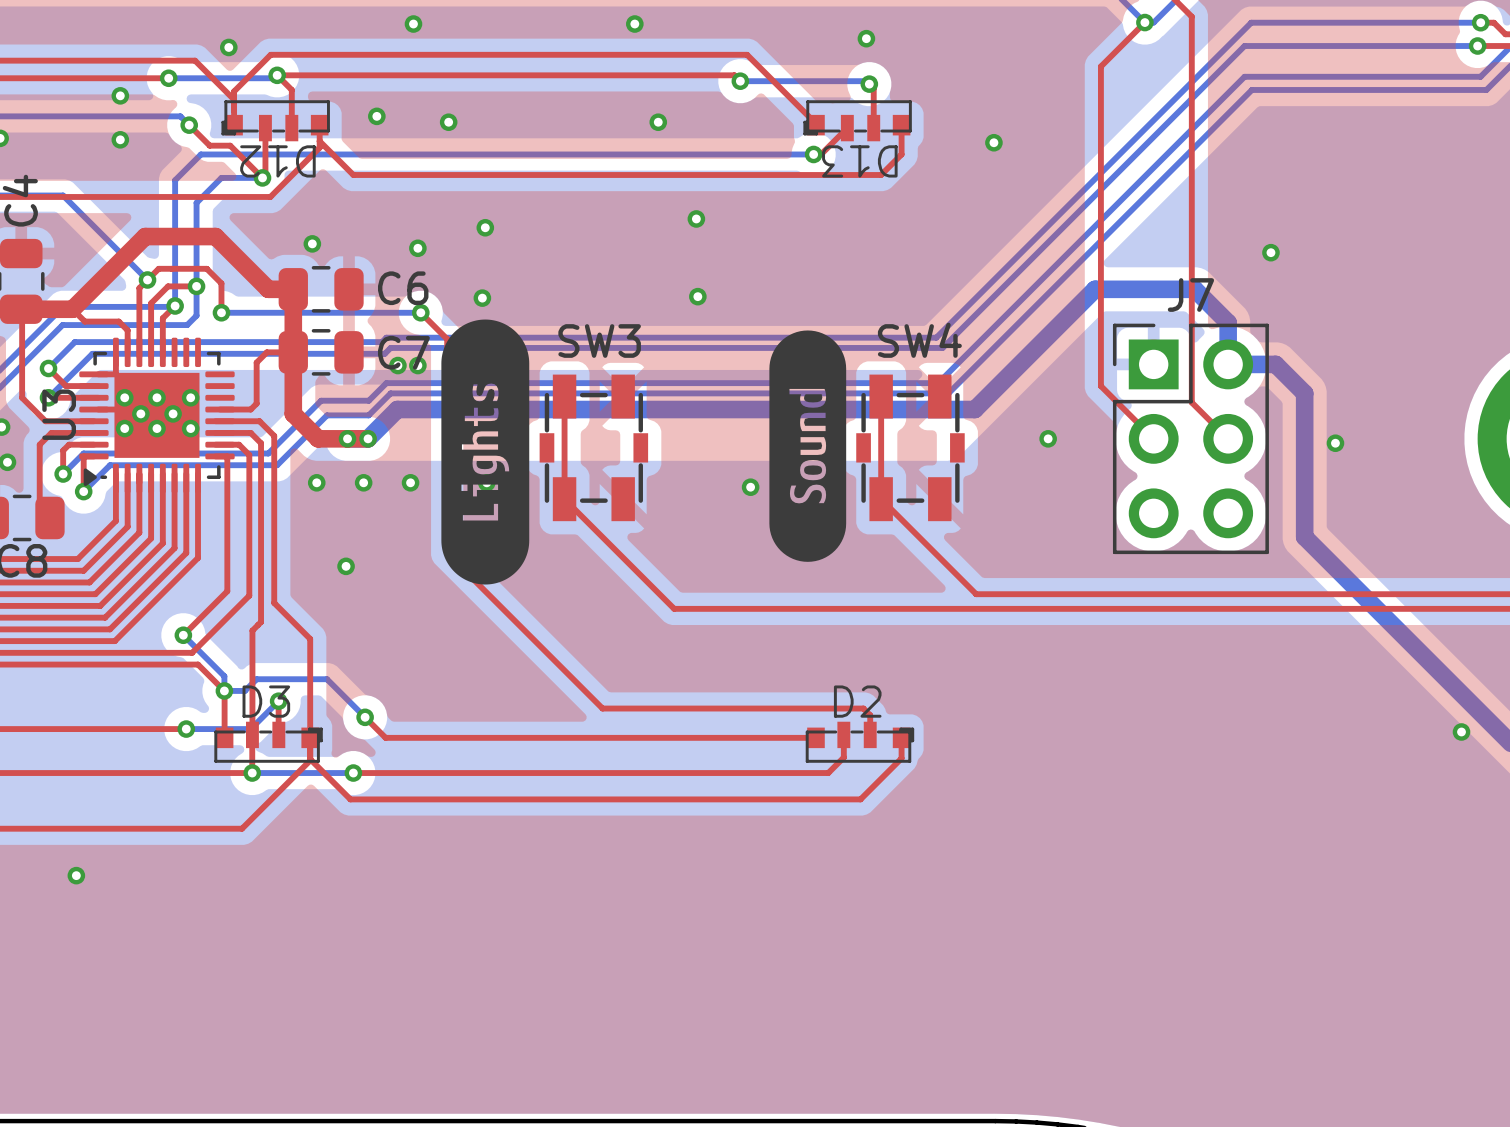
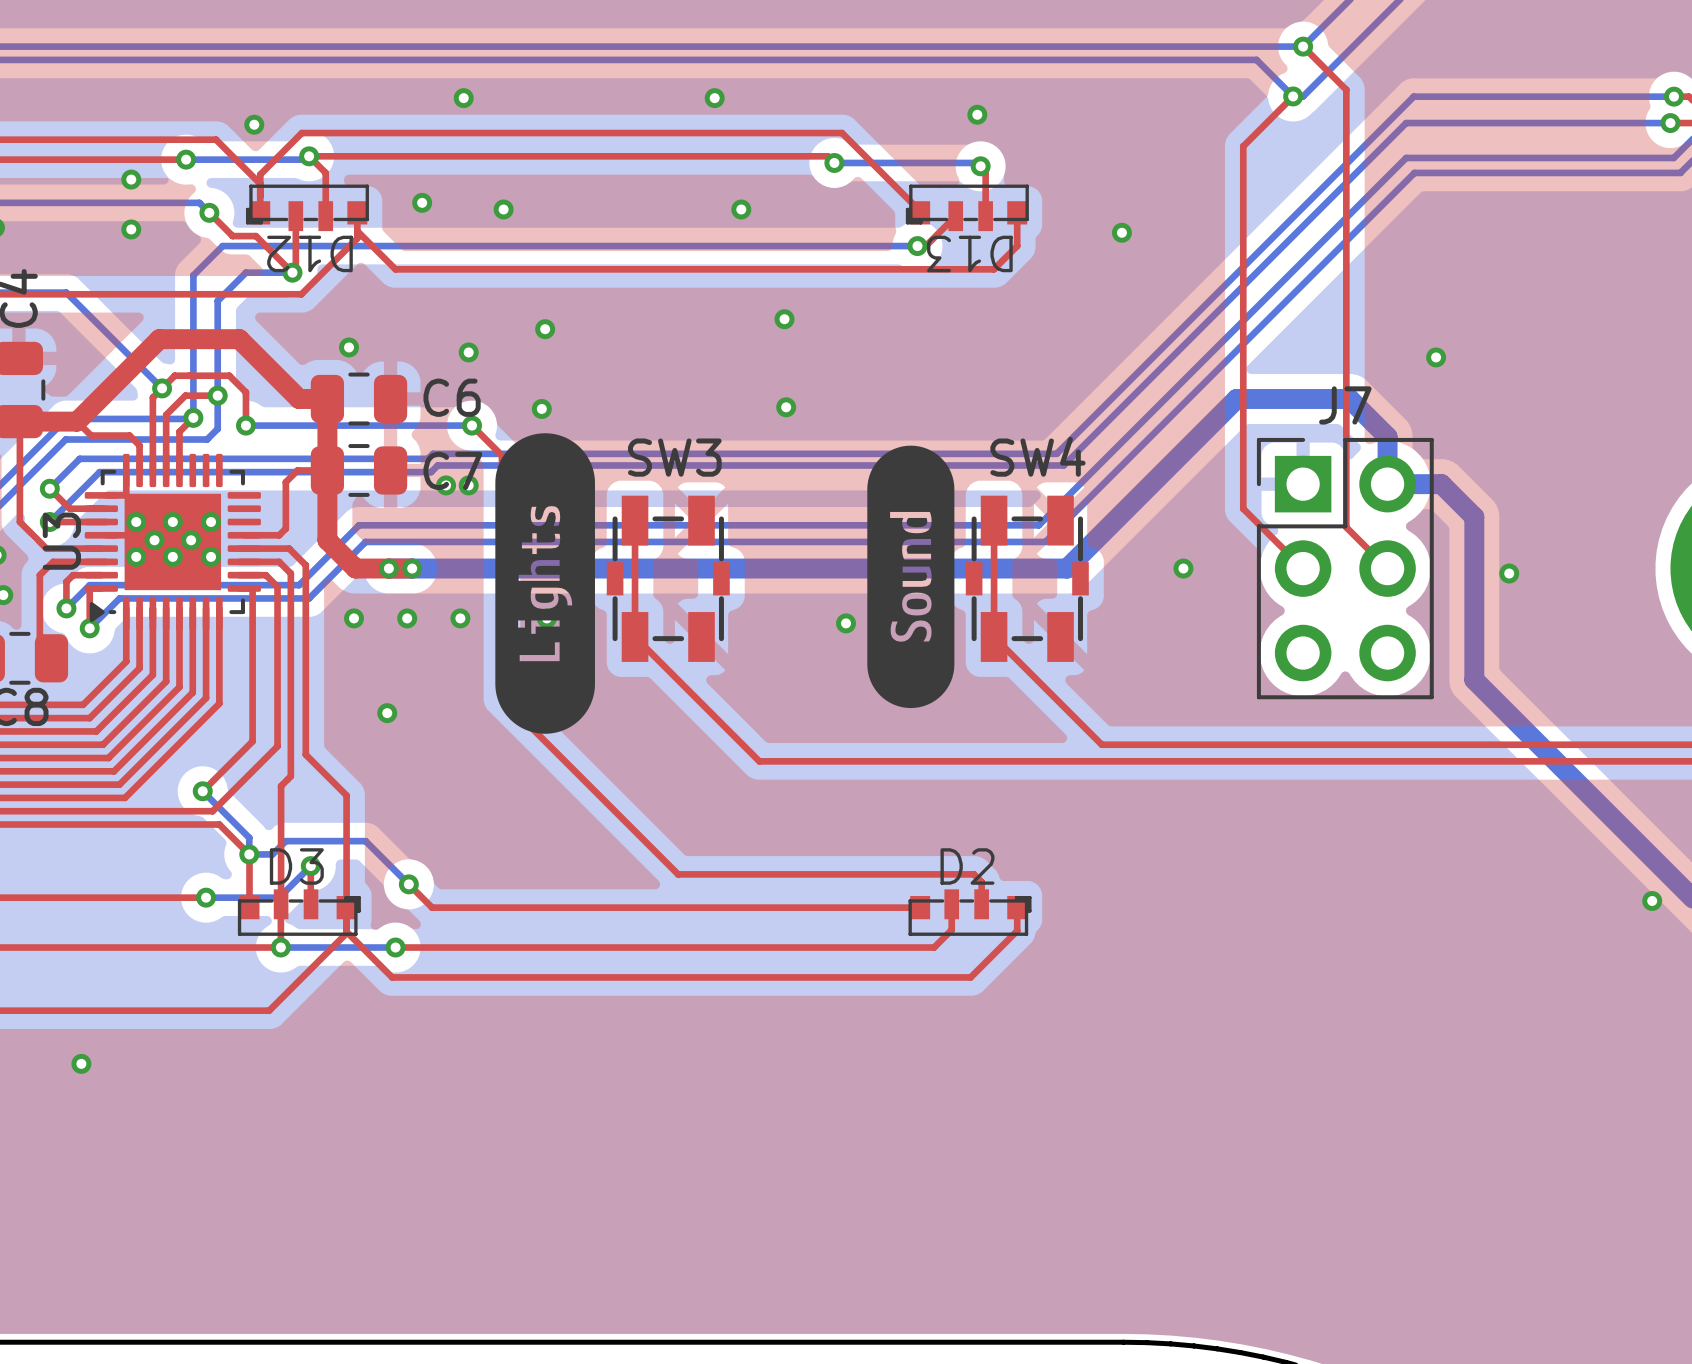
bottom track: (938, 383) (386, 383) (368, 400) -> (1058, 505) (1038, 525) (413, 525)
bottom track: (948, 393) (390, 393) (368, 415) -> (1070, 517) (1045, 541) (412, 541)
bottom track: (974, 409) (397, 409) (368, 438) -> (1100, 535) (1067, 568) (412, 568)

